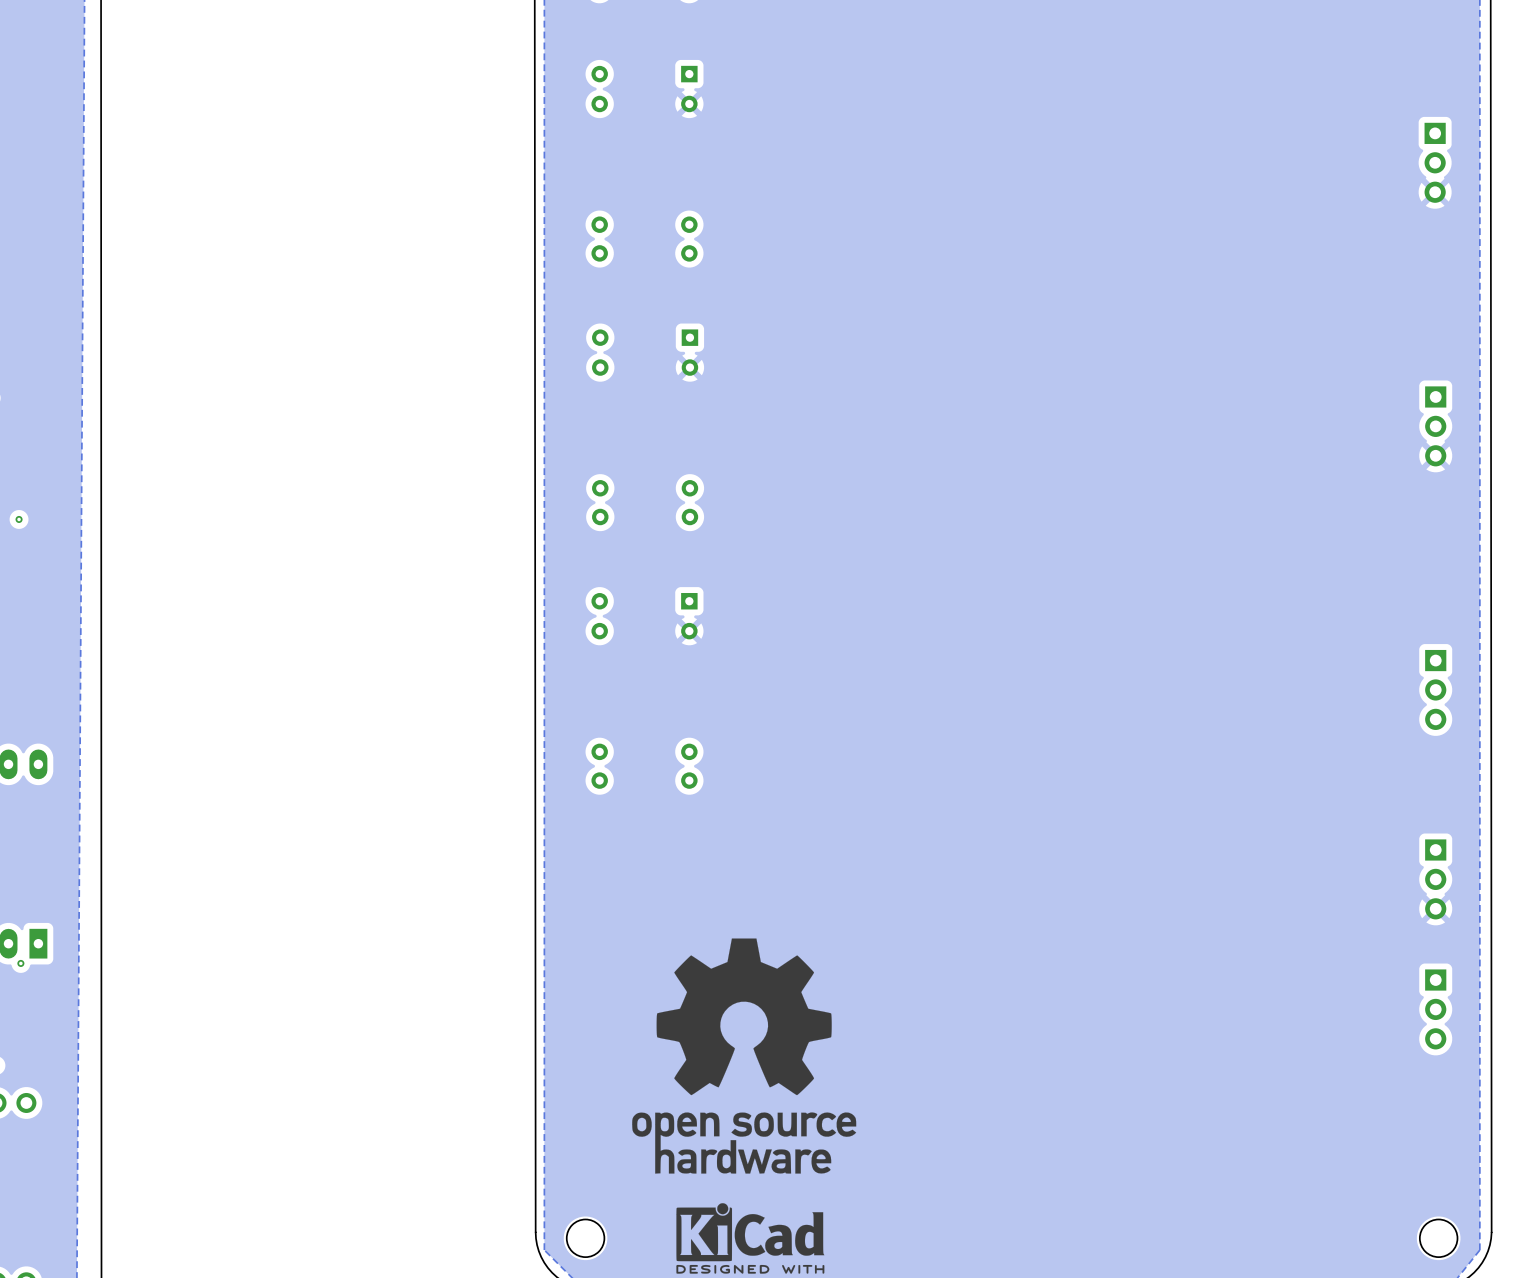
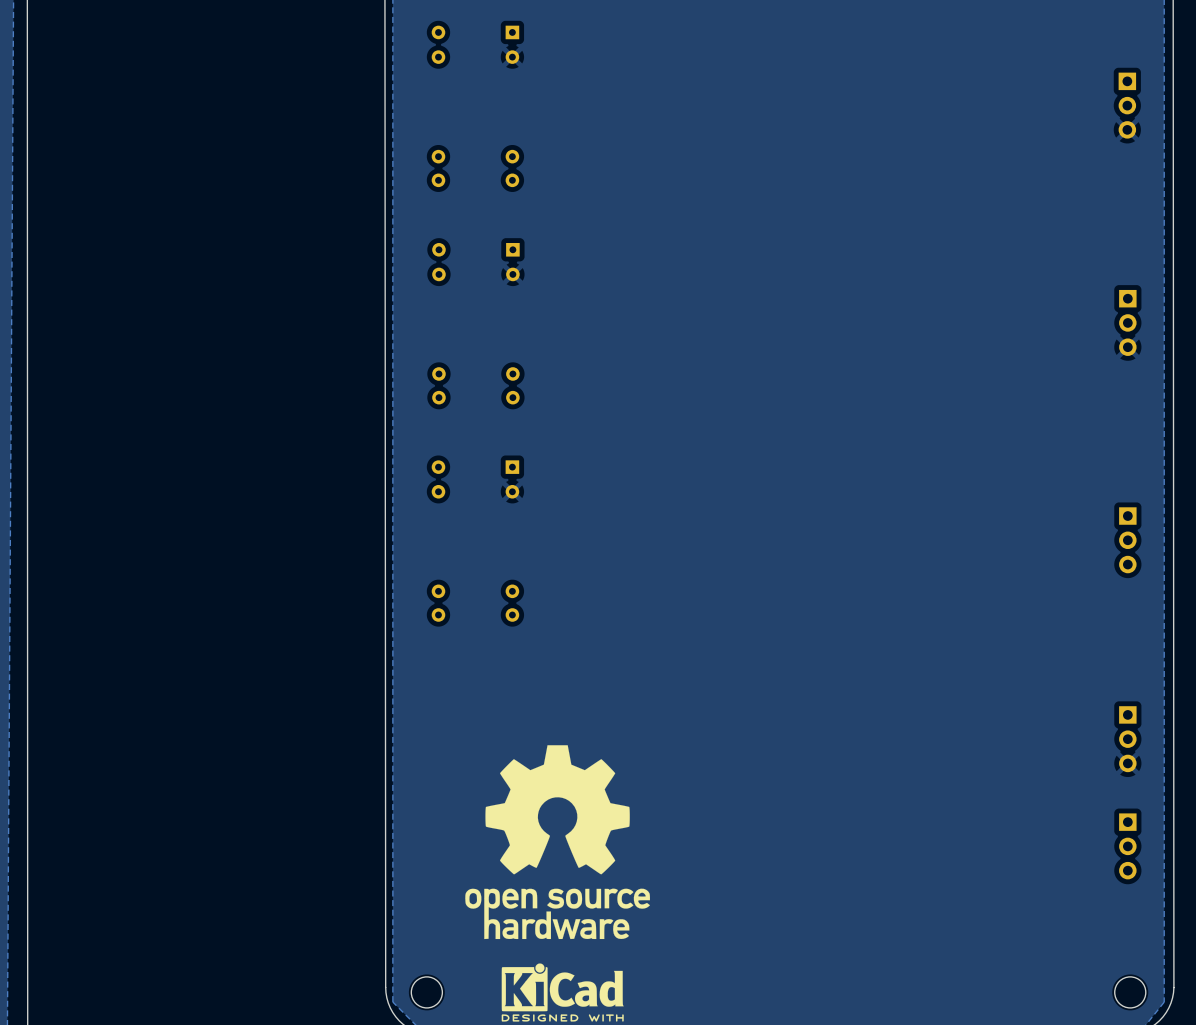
part: (1435, 879) -> none
part: none -> (1127, 739)
part: (1435, 1009) -> none
part: none -> (1127, 846)

